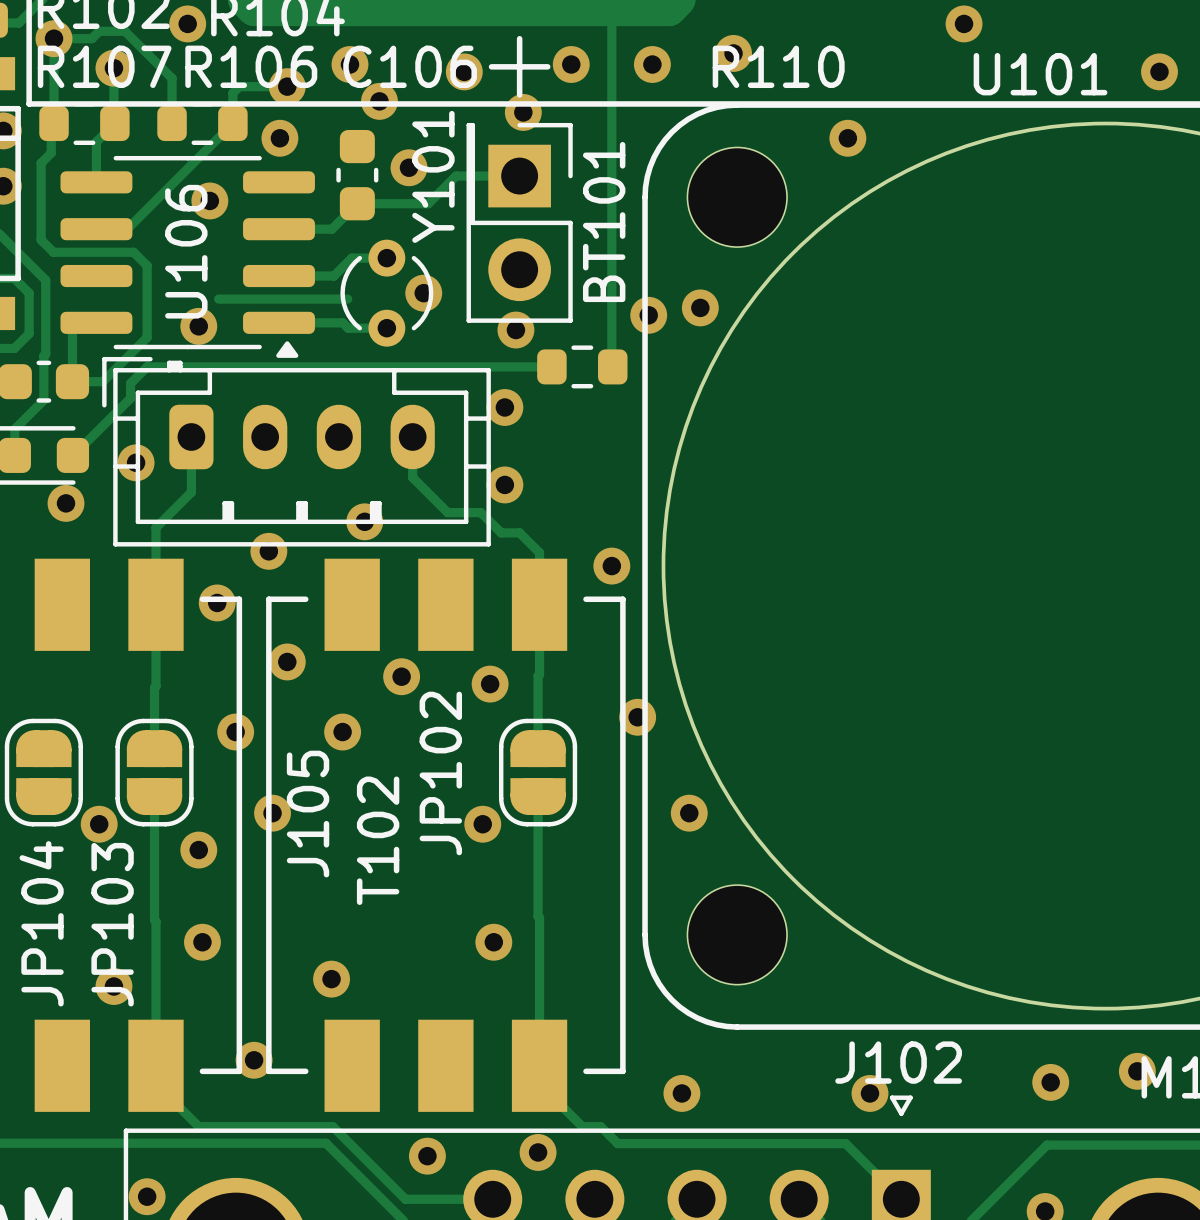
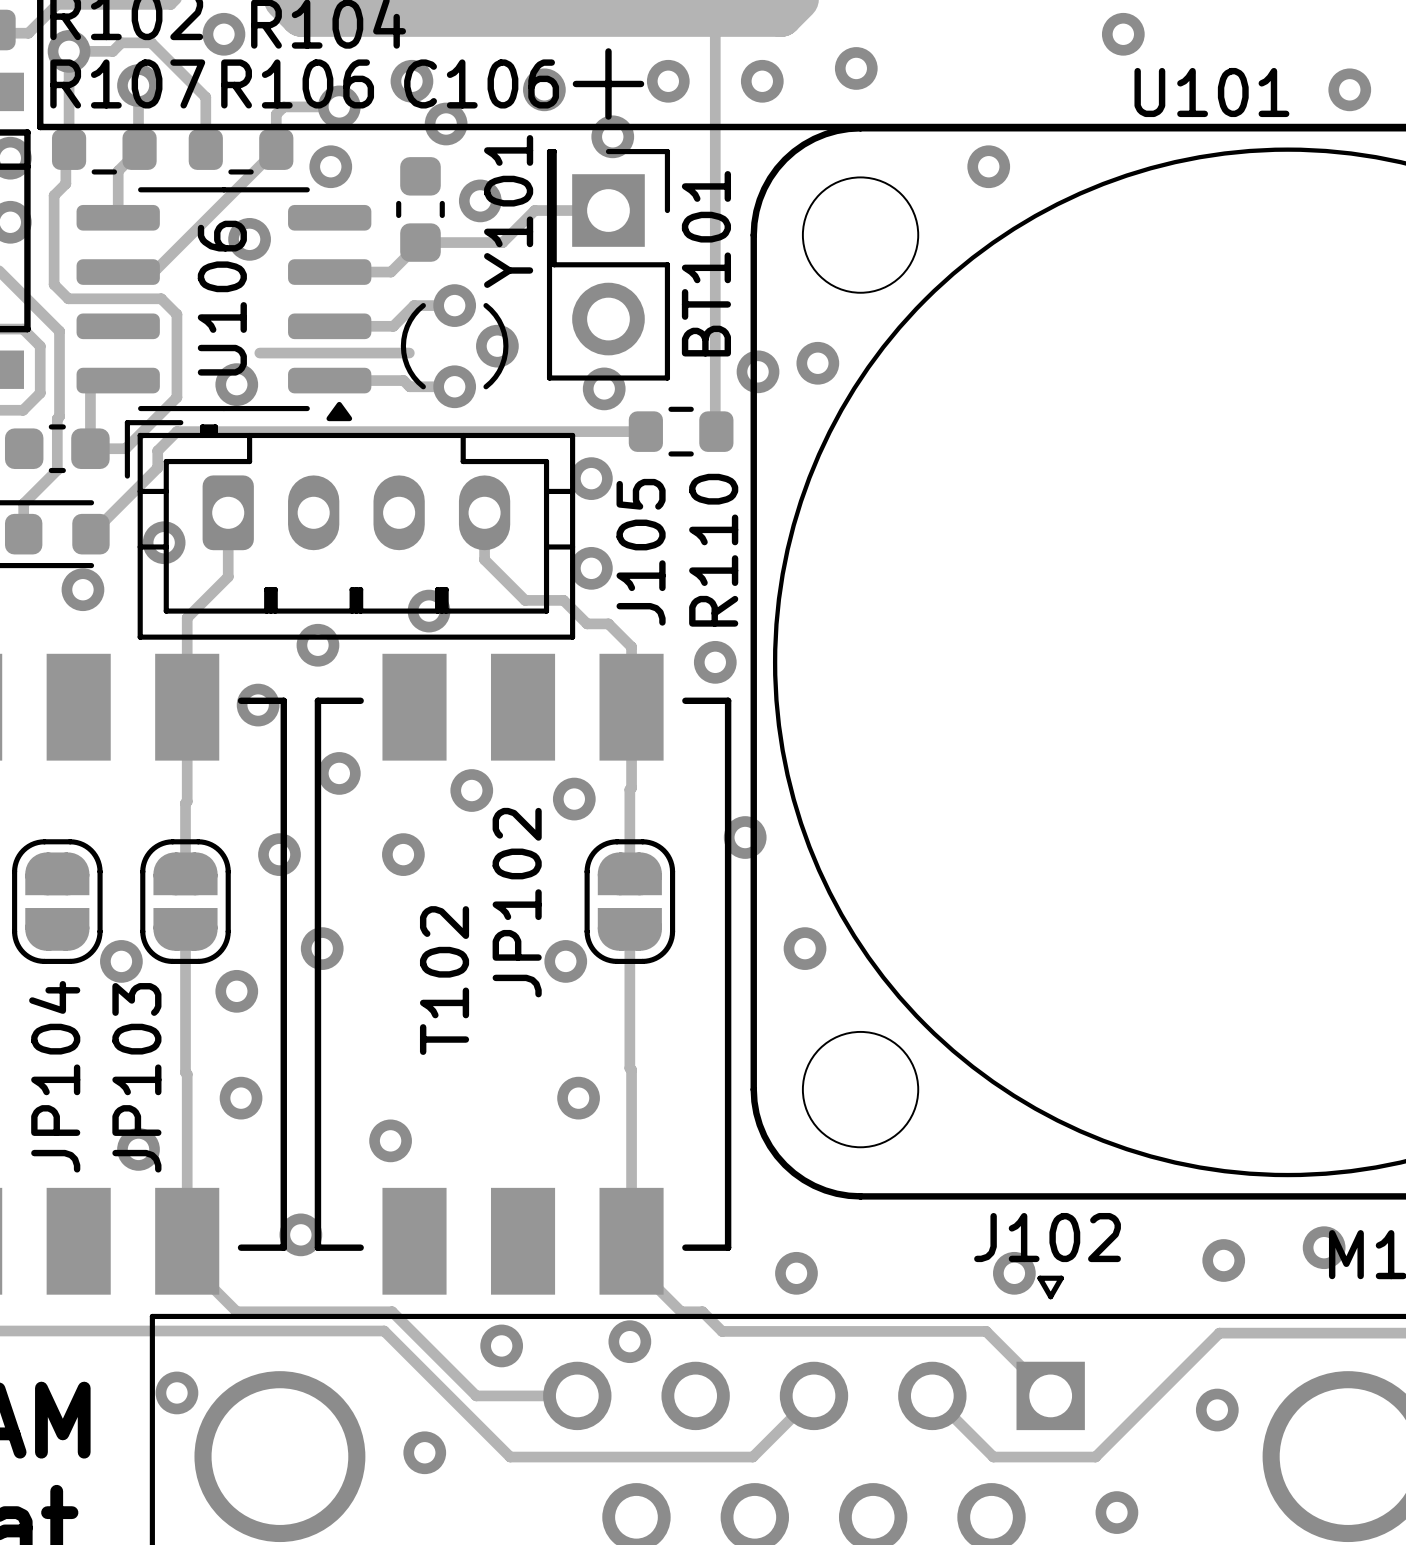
R110 name rotation: 0° (778, 66) -> 90° counterclockwise (713, 550)
R110 name position: R110 (778, 66) -> R110 (713, 550)
J105 name position: J105 (308, 814) -> J105 (641, 552)

